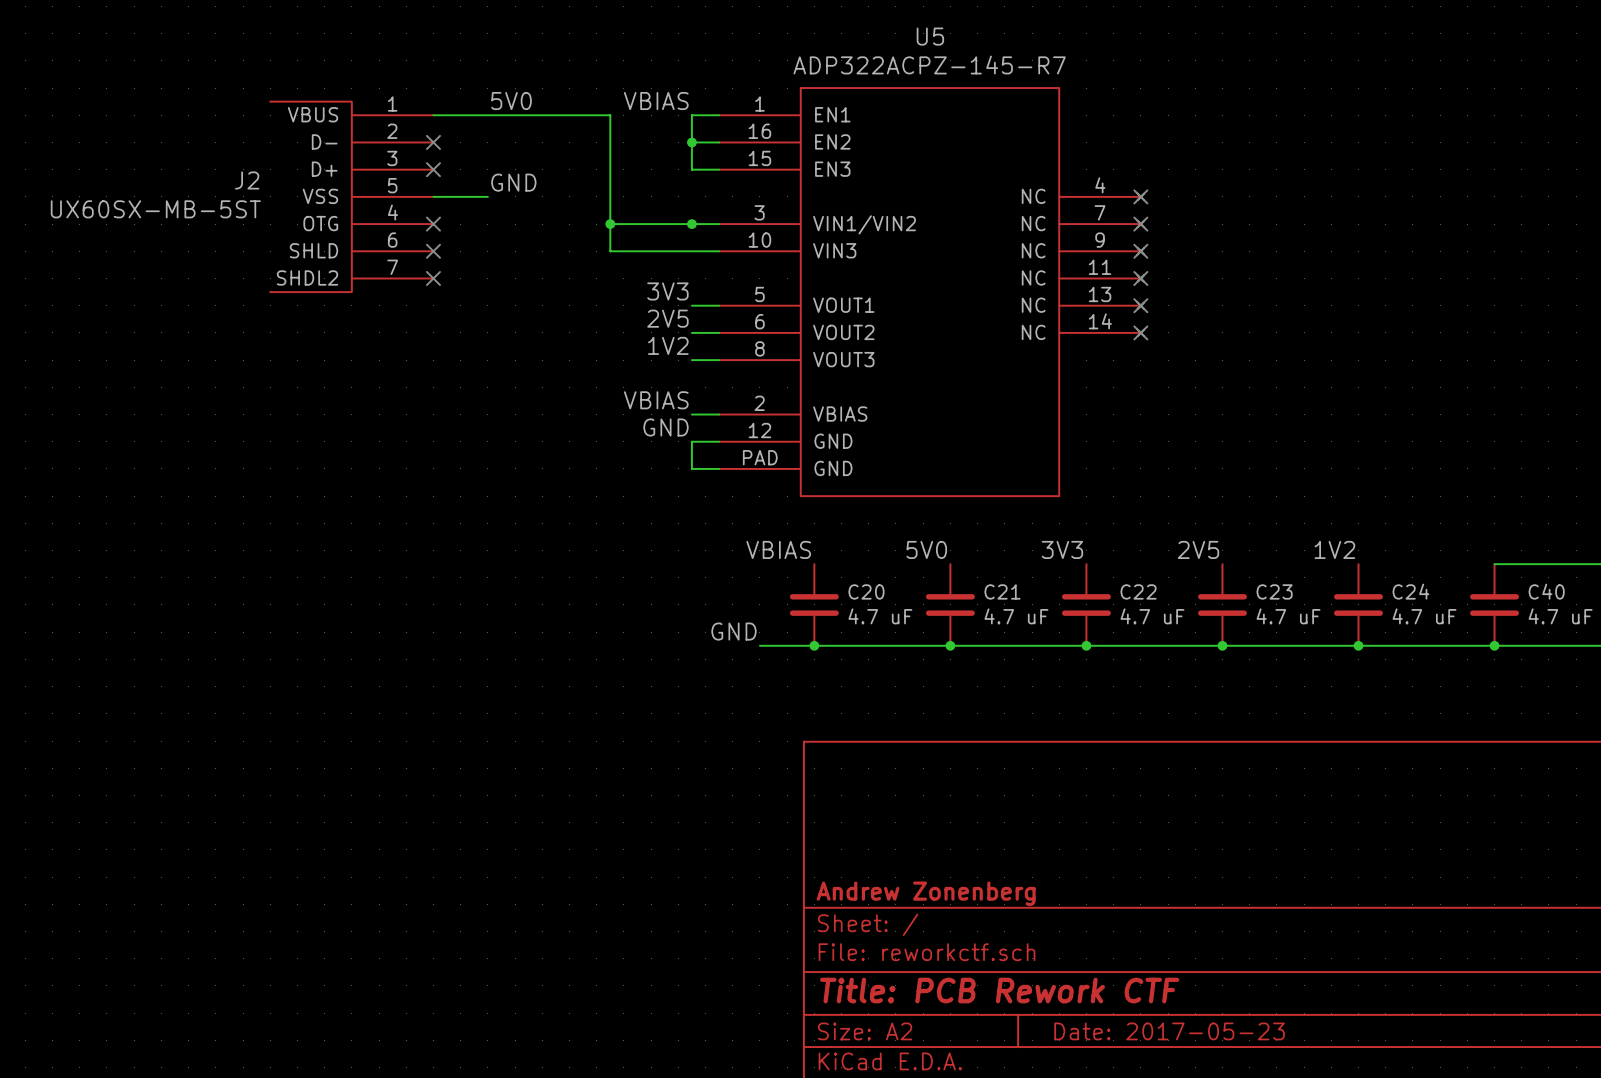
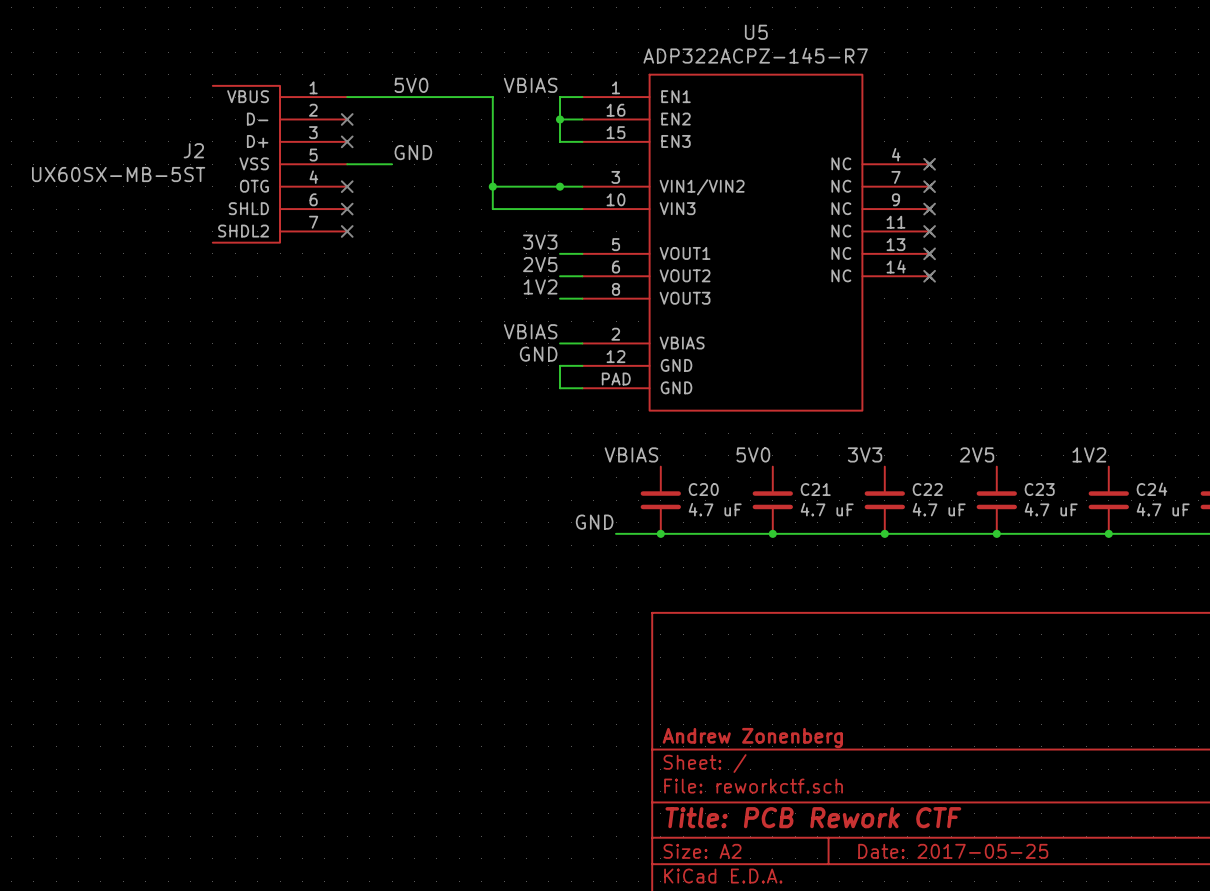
title block: Date: 2017-05-23 (1169, 1031) -> Date: 2017-05-25 (953, 851)

